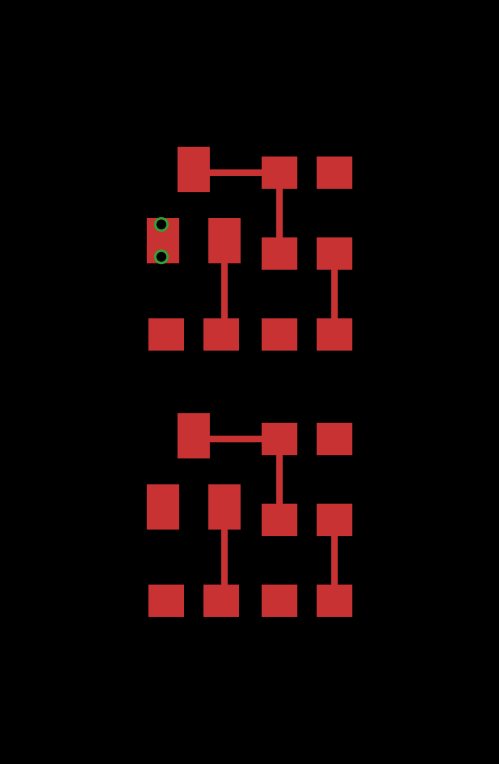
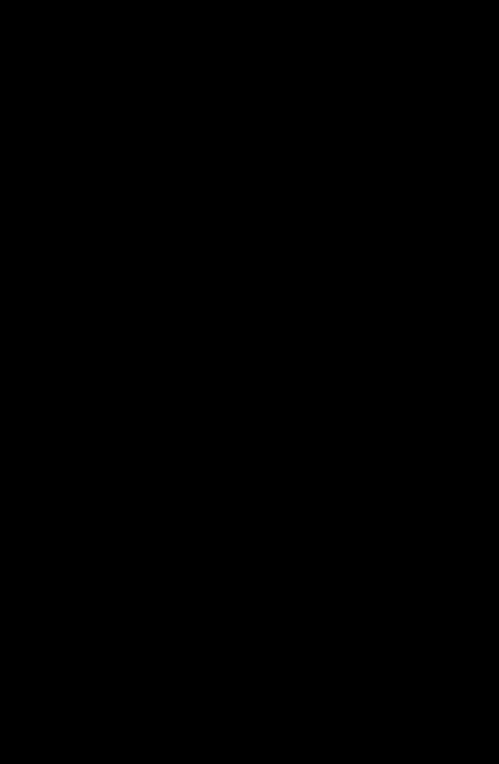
top track: (193, 169) (196, 172) (279, 172) (279, 253) -> none
part: (306, 172) -> none
part: (193, 205) -> none
via: (161, 224) -> none
top track: (224, 240) (224, 331) (221, 334) -> none
part: (306, 253) -> none
top track: (334, 253) (334, 334) (326, 342) -> none
via: (161, 256) -> none
part: (193, 334) -> none
part: (306, 334) -> none
top track: (193, 435) (196, 438) (279, 438) (279, 519) -> none
part: (306, 438) -> none
part: (193, 471) -> none
top track: (224, 506) (224, 597) (221, 600) -> none
part: (306, 519) -> none
top track: (334, 519) (334, 600) -> none
part: (193, 600) -> none
part: (306, 600) -> none

